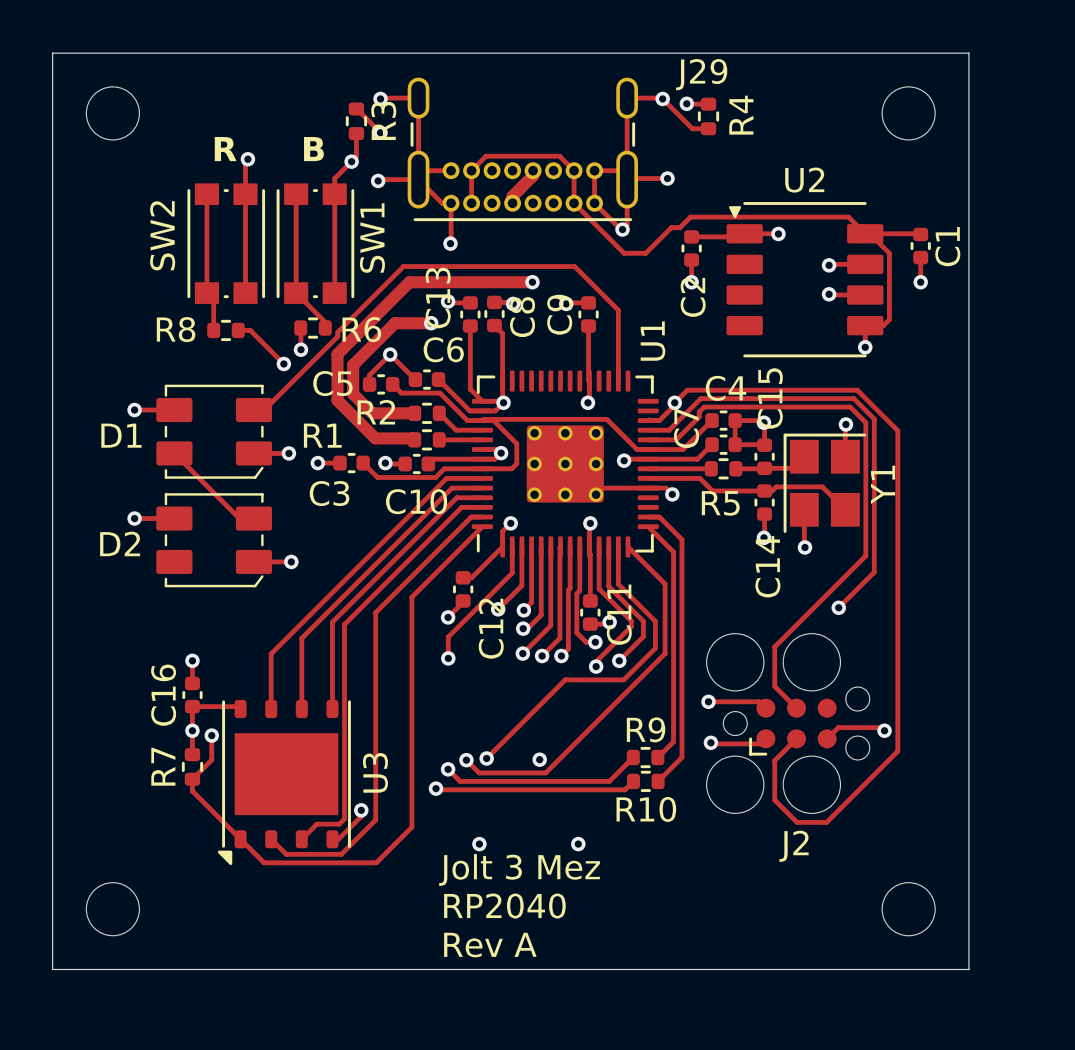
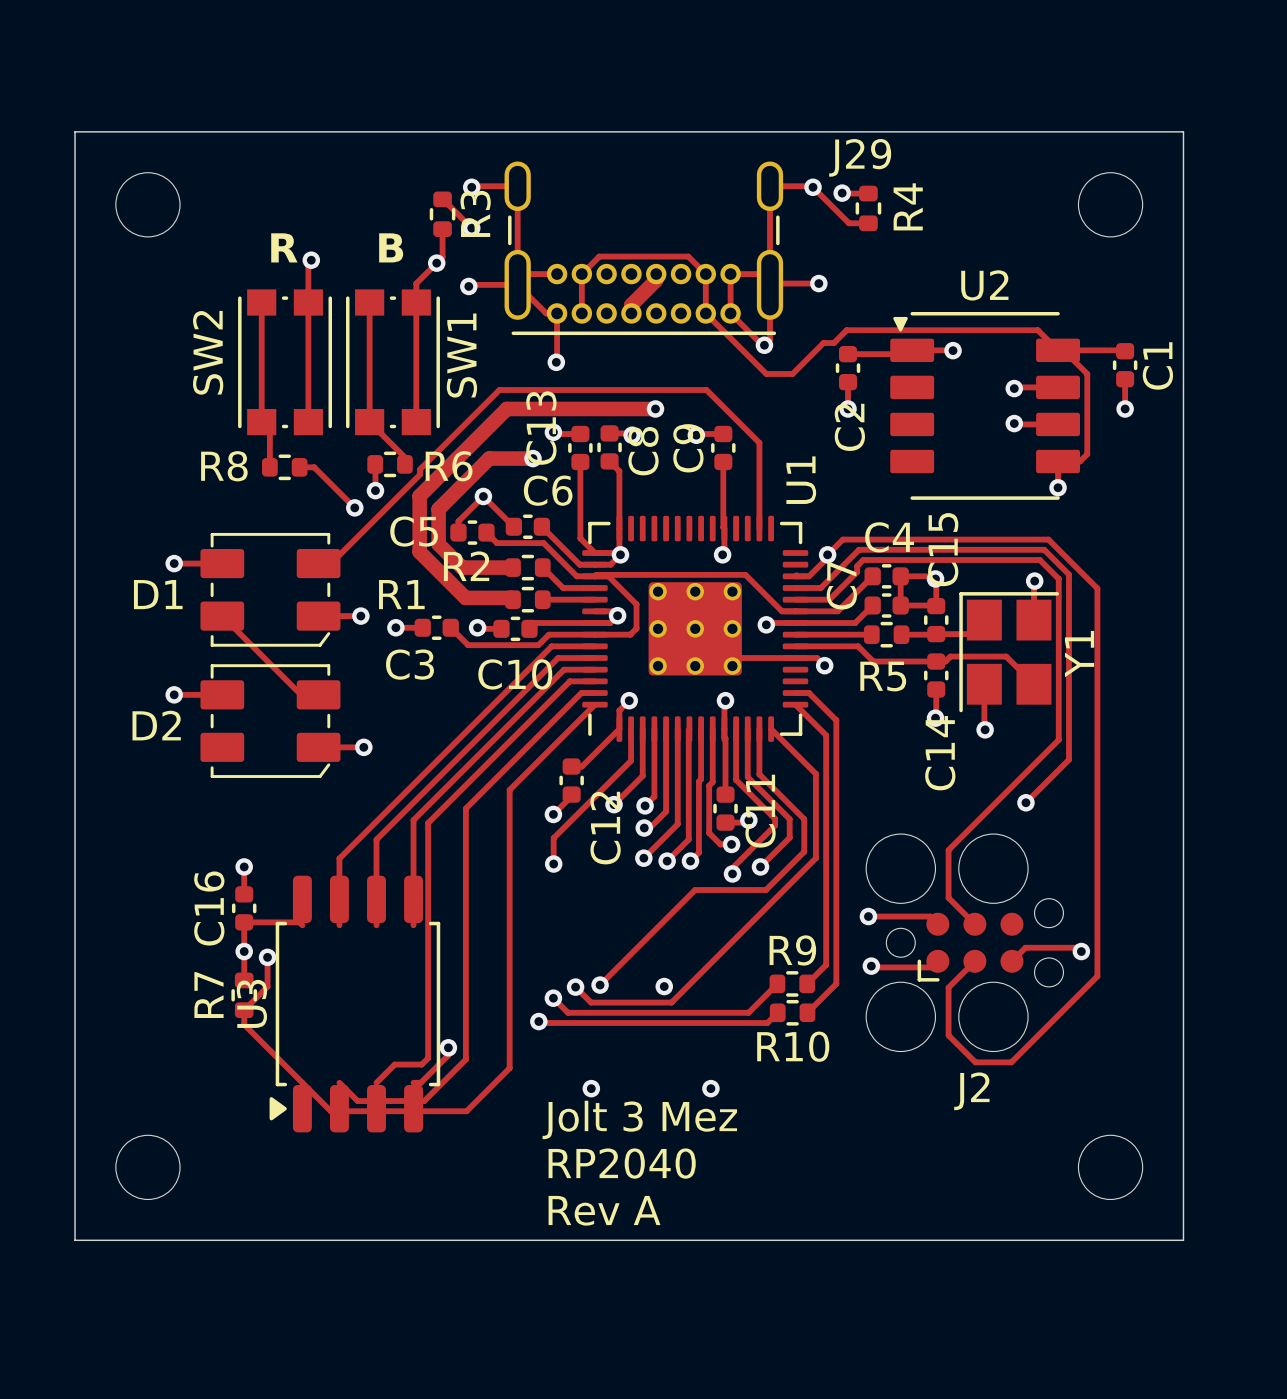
U3 footprint: [217, 700, 351, 866] -> [269, 875, 441, 1133]
U3 name position: U3 (375, 772) -> U3 (251, 1003)

